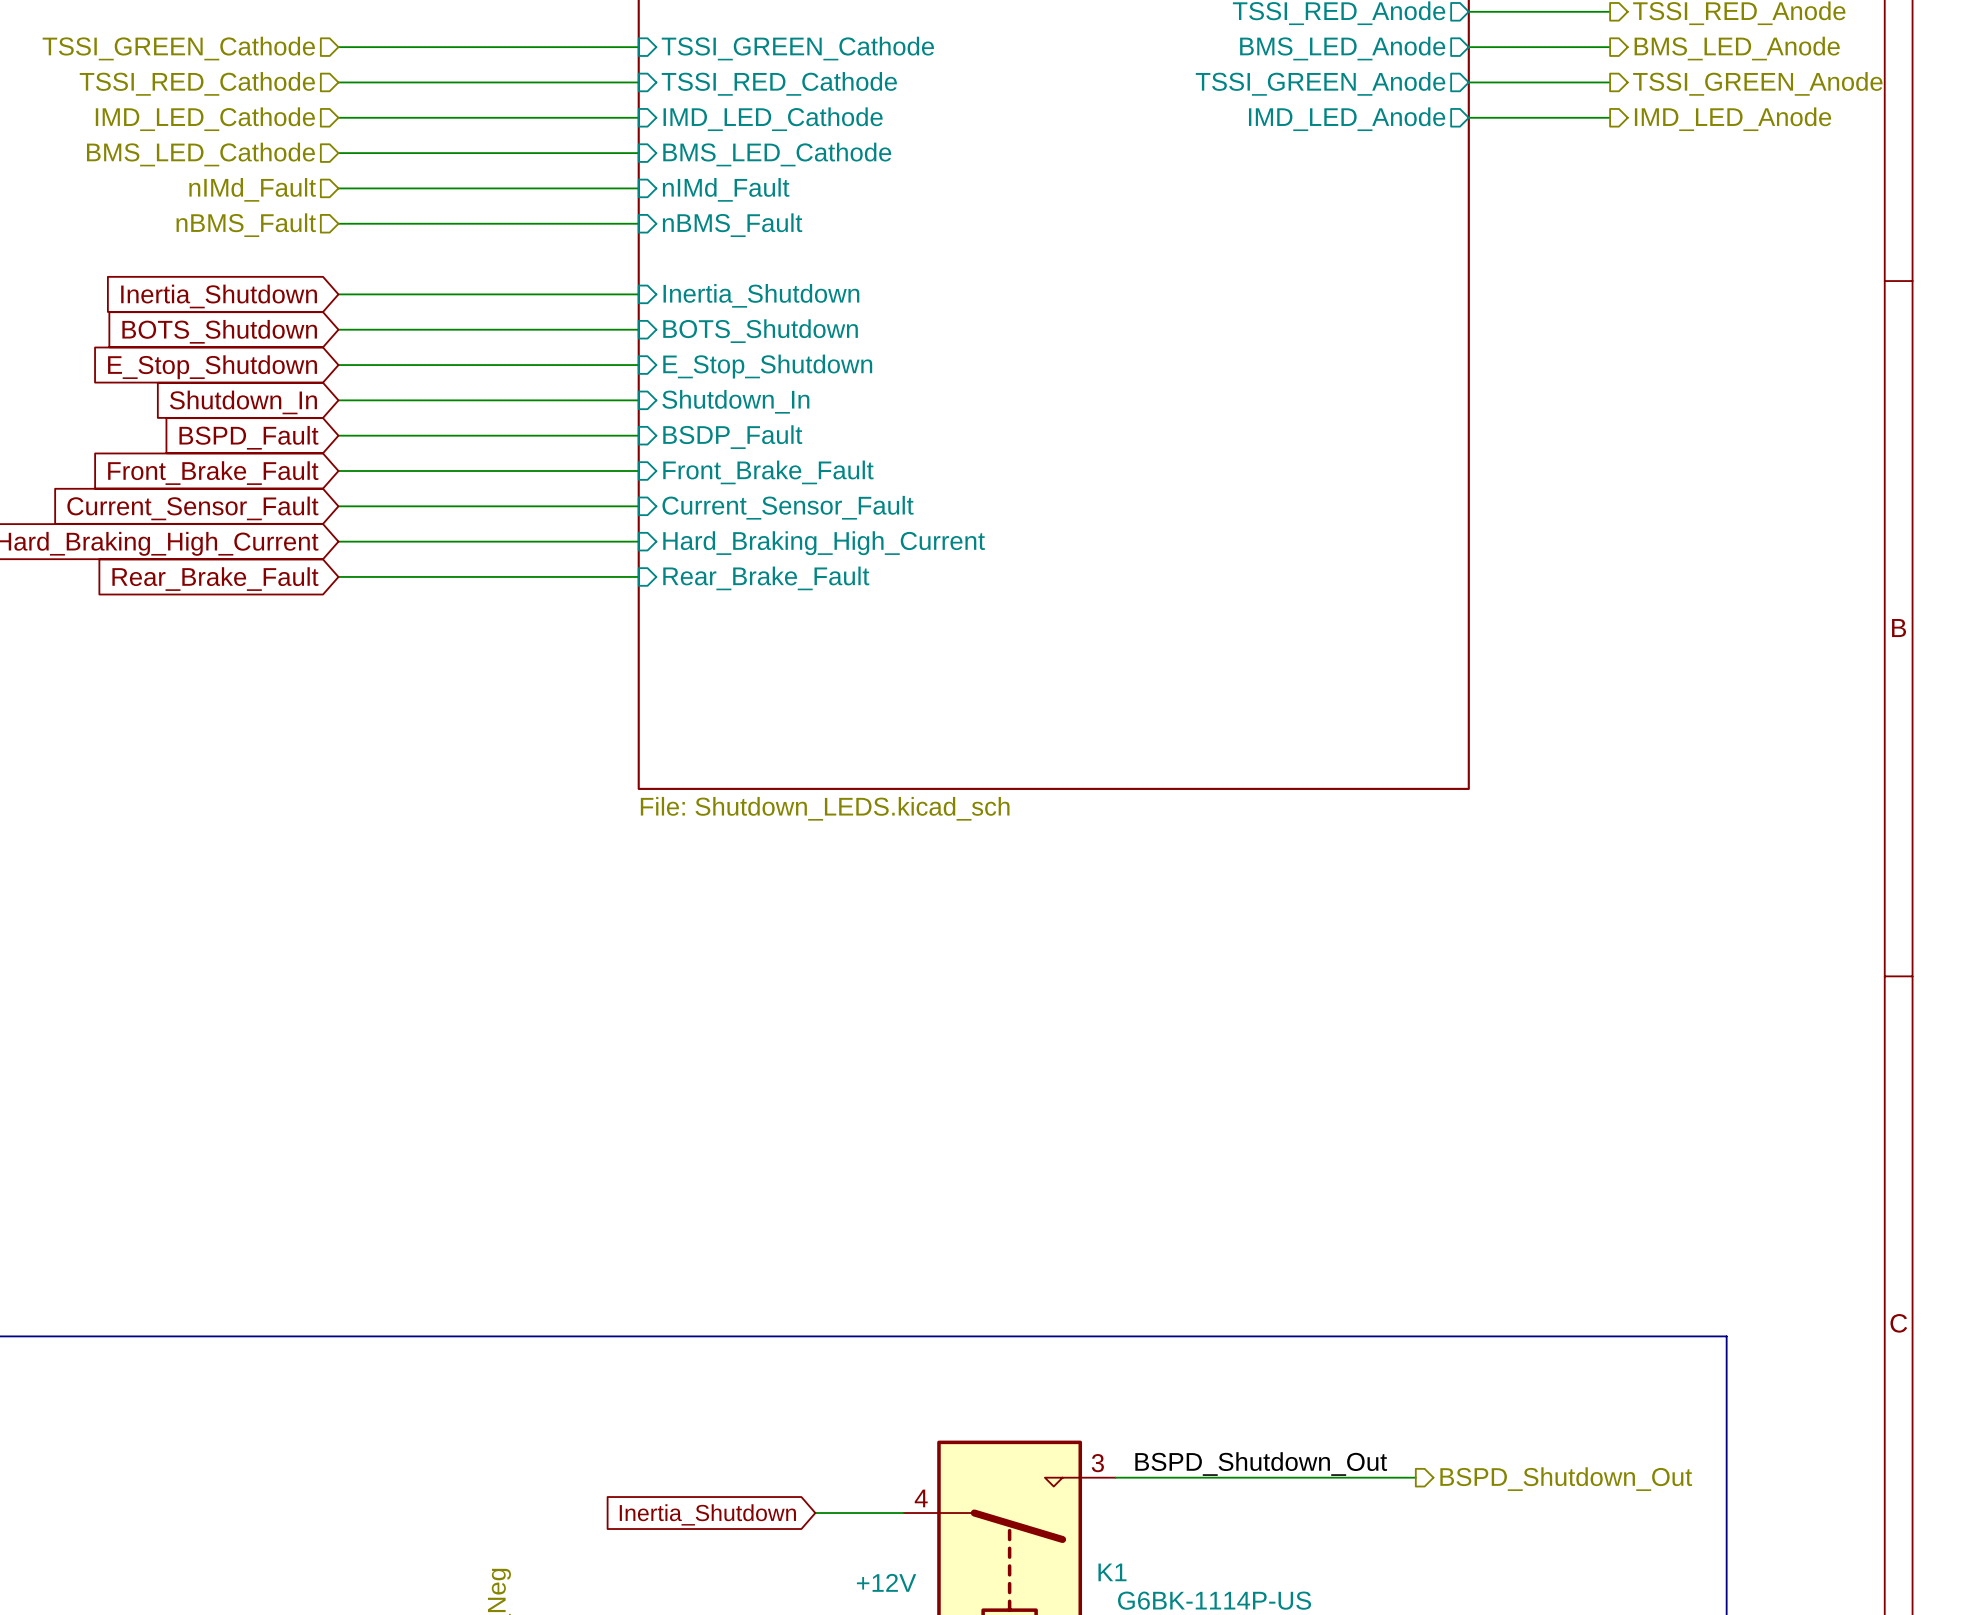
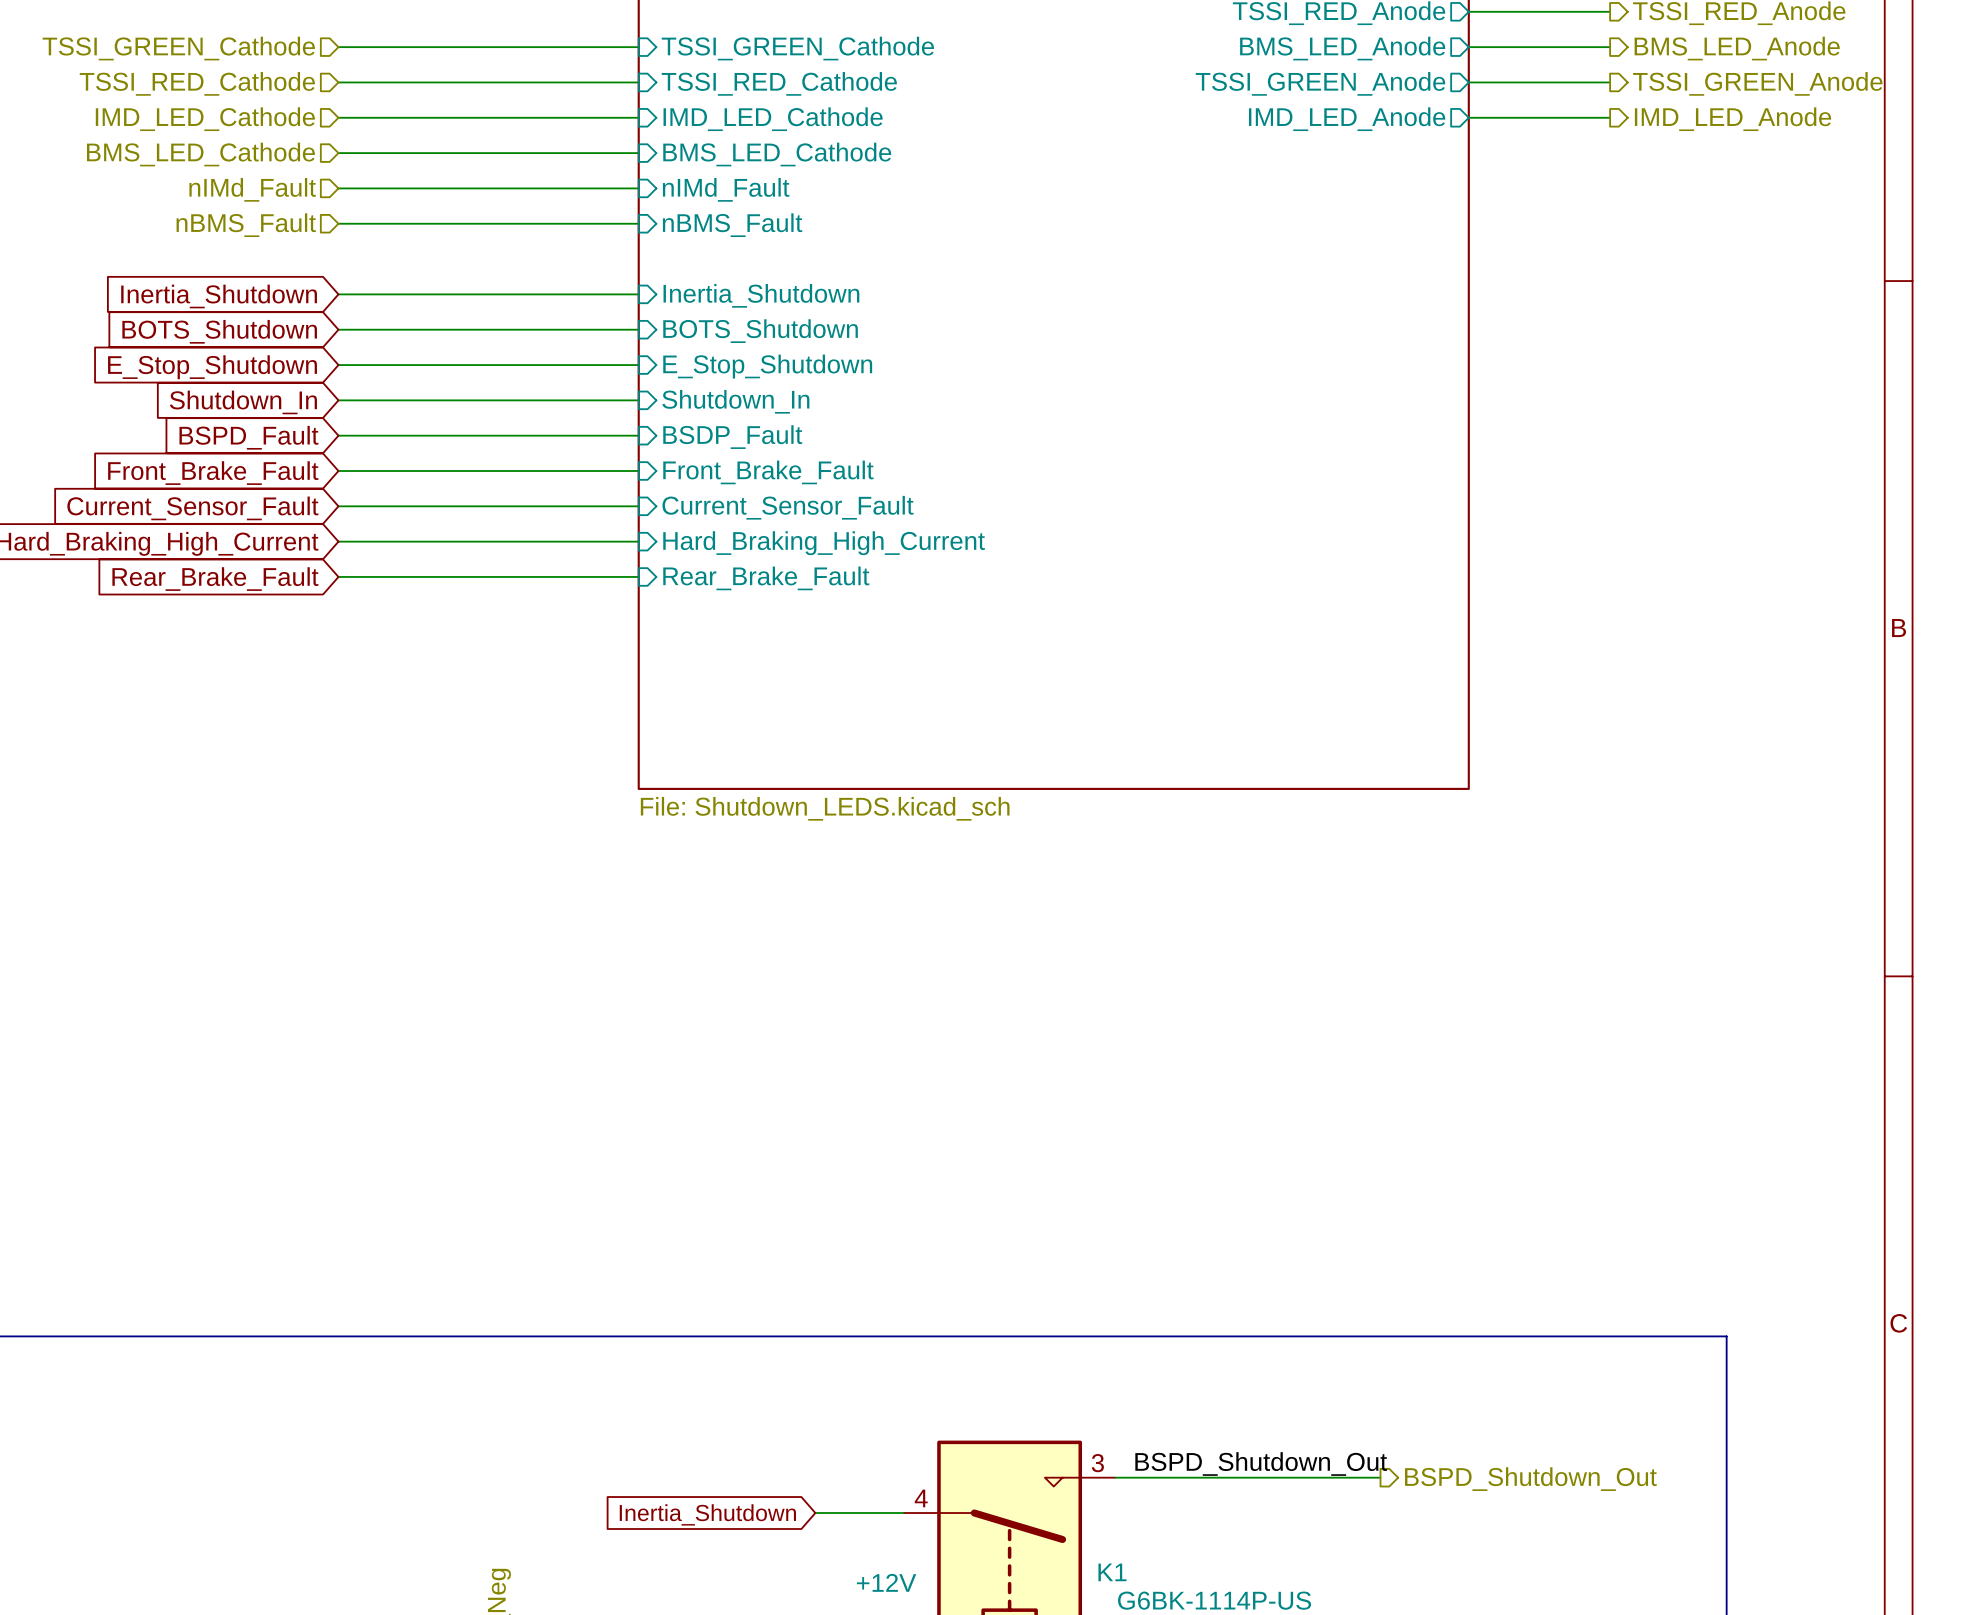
wire: (1380, 1477) (1415, 1477) -> none
hierarchical label position: BSPD_Shutdown_Out (1566, 1479) -> BSPD_Shutdown_Out (1530, 1479)

